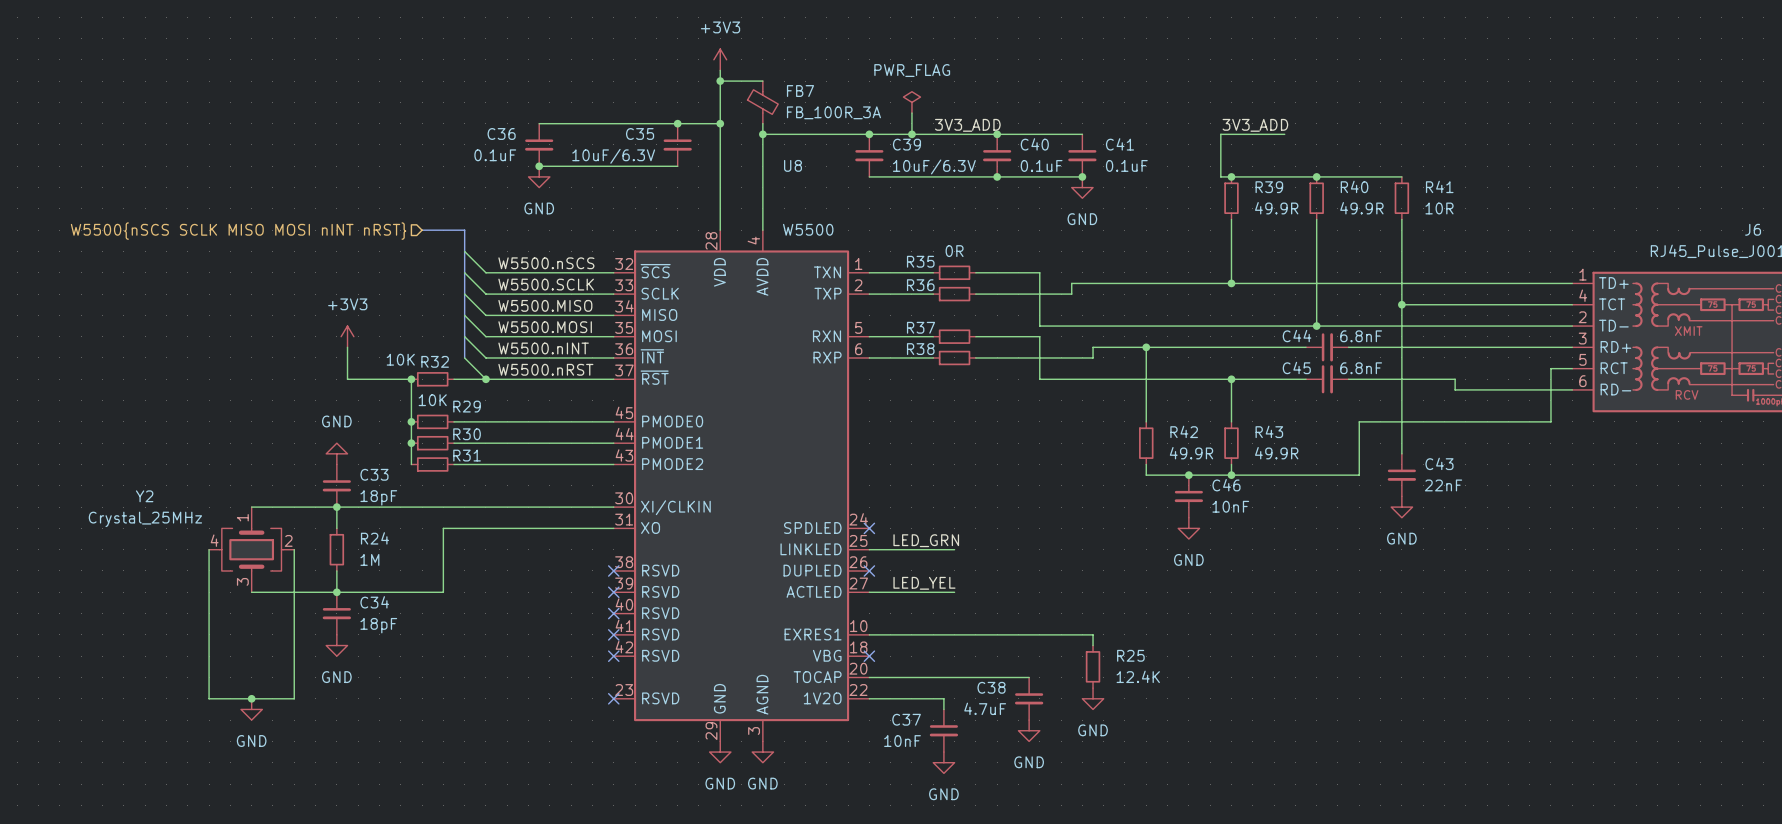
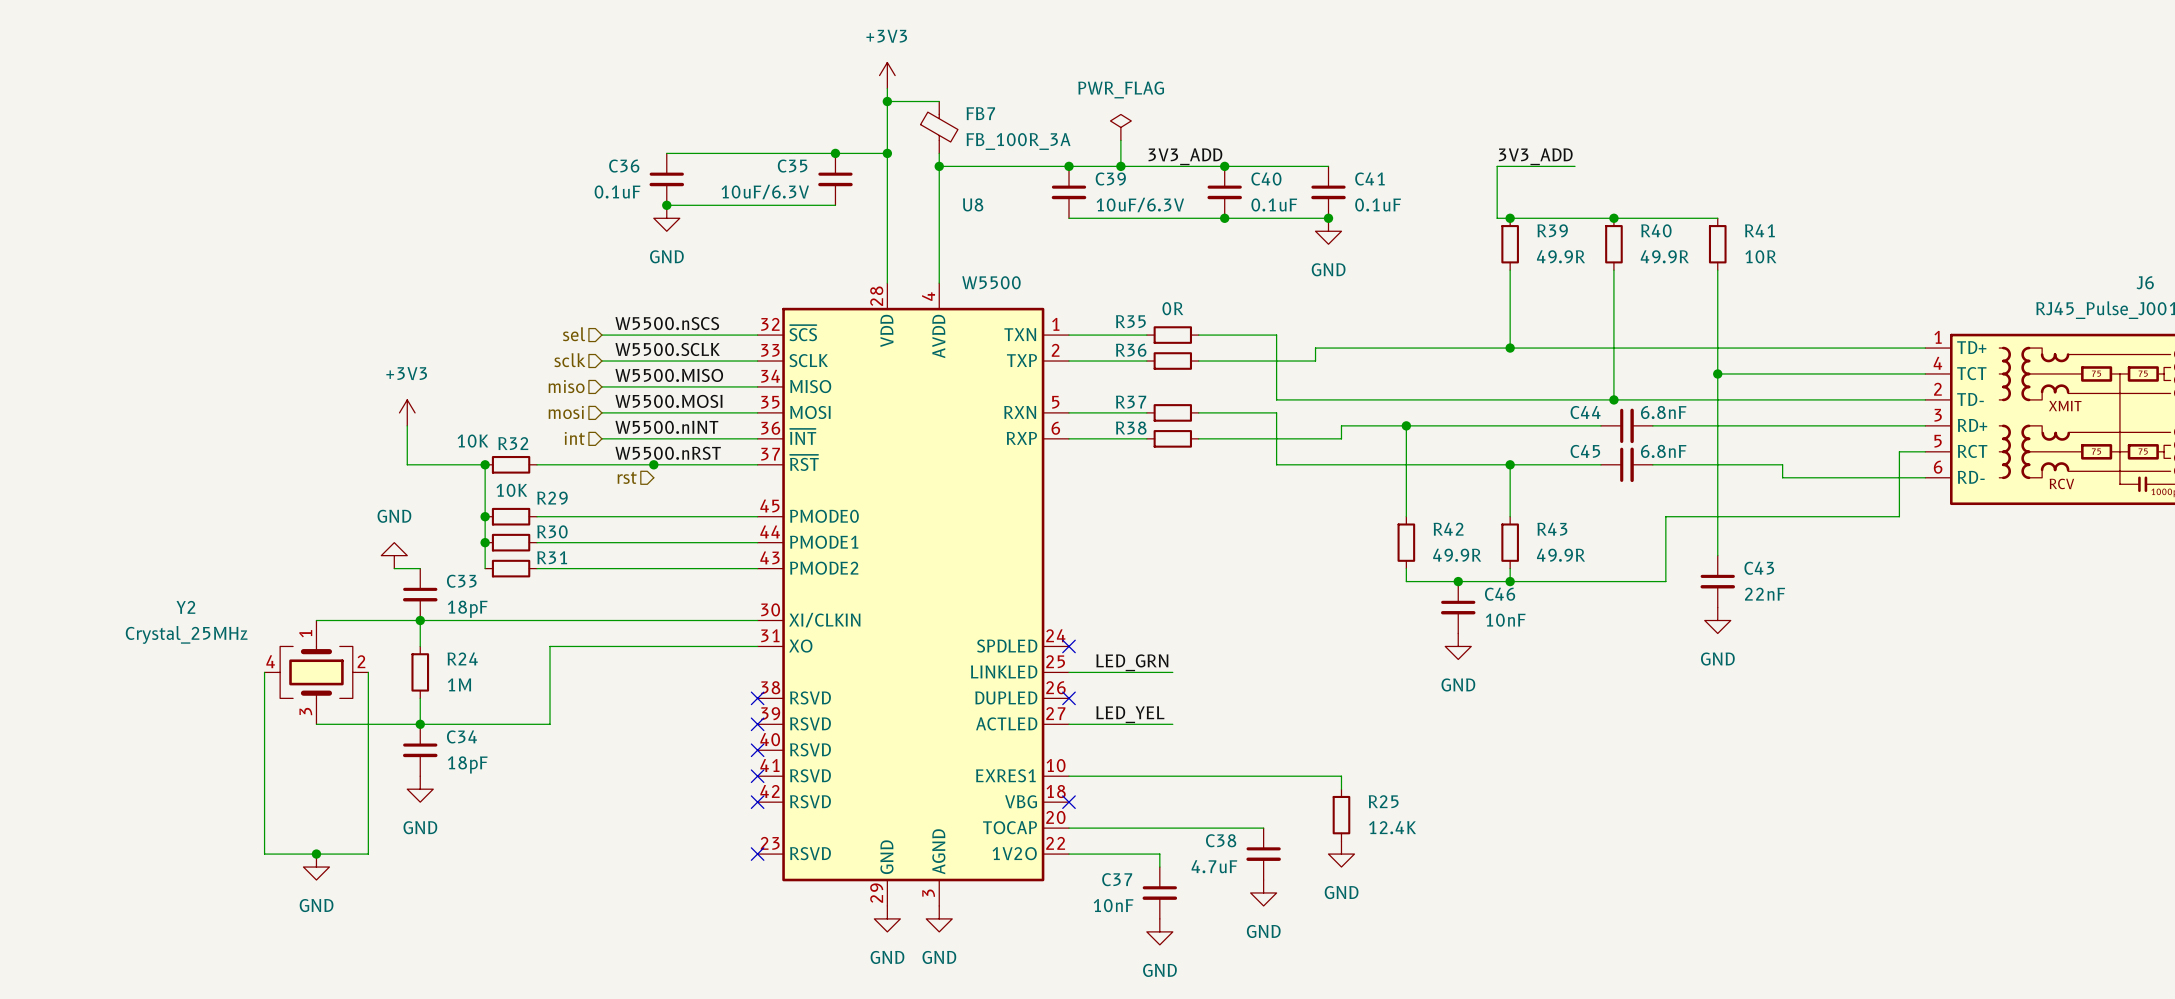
bus: (422, 230) (464, 230) (464, 357) -> none
hierarchical label: W5500{nSCS SCLK MISO MOSI nINT nRST} (238, 231) -> none
wire: (464, 251) (485, 272) -> none
hierarchical label: none -> sel (574, 334)
wire: (464, 272) (485, 294) -> none
hierarchical label: none -> sclk (569, 360)
wire: (464, 294) (485, 315) -> none
hierarchical label: none -> miso (566, 386)
wire: (464, 315) (485, 336) -> none
power symbol position: +3V3 (347, 336) -> +3V3 (407, 412)
hierarchical label: none -> mosi (566, 412)
wire: (464, 336) (485, 357) -> none
wire: (347, 347) (347, 379) -> (407, 425) (407, 464) (433, 464)
hierarchical label: none -> int (574, 438)
wire: (464, 357) (485, 379) -> none
wire: (390, 379) (411, 379) (411, 464) -> (485, 464) (485, 568)
junction position: (411, 379) -> (485, 464)
wire: none -> (537, 464) (562, 464)
R32 position: (432, 379) -> (511, 464)
junction position: (485, 379) -> (653, 464)
hierarchical label: none -> rst (627, 477)
junction: none -> (485, 516)
junction: (411, 421) -> none
wire: none -> (537, 516) (562, 516)
R29 position: (432, 421) -> (511, 516)
junction: none -> (485, 542)
junction: (411, 443) -> none
wire: none -> (537, 542) (562, 542)
R30 position: (432, 443) -> (511, 542)
power symbol position: GND (336, 453) -> GND (394, 555)
wire: none -> (394, 568) (420, 568)
wire: none -> (537, 568) (562, 568)
R31 position: (432, 464) -> (511, 568)

